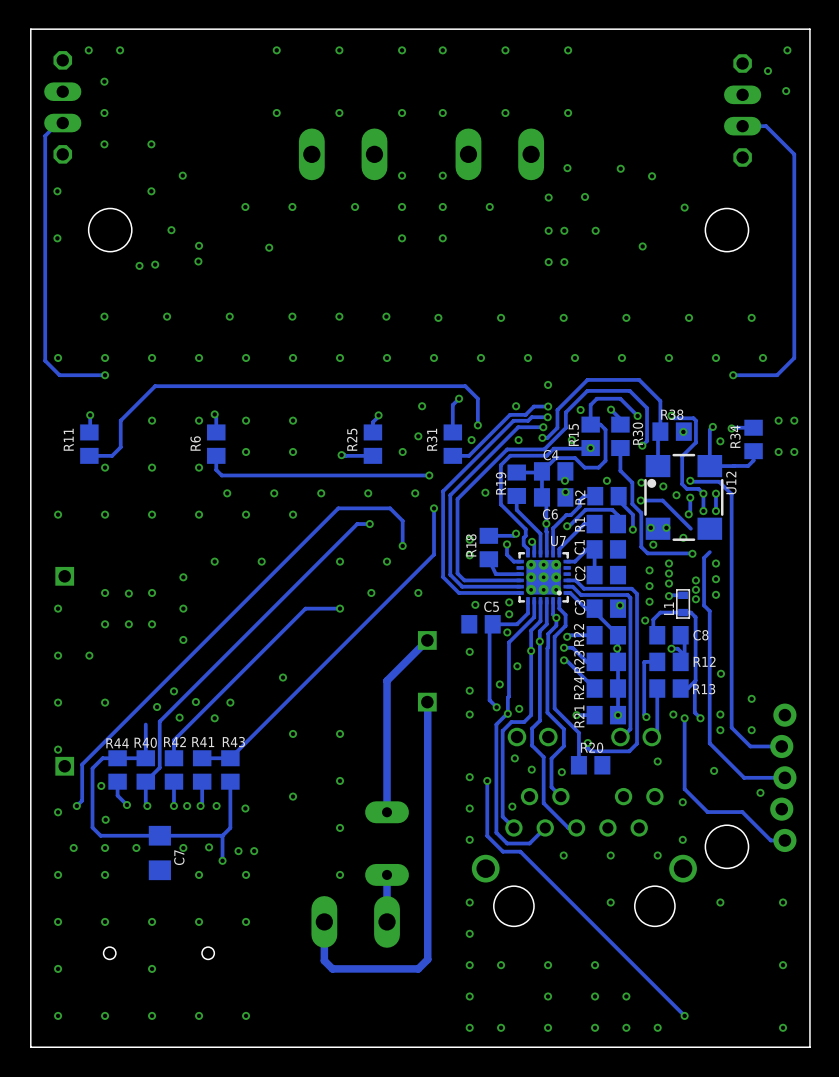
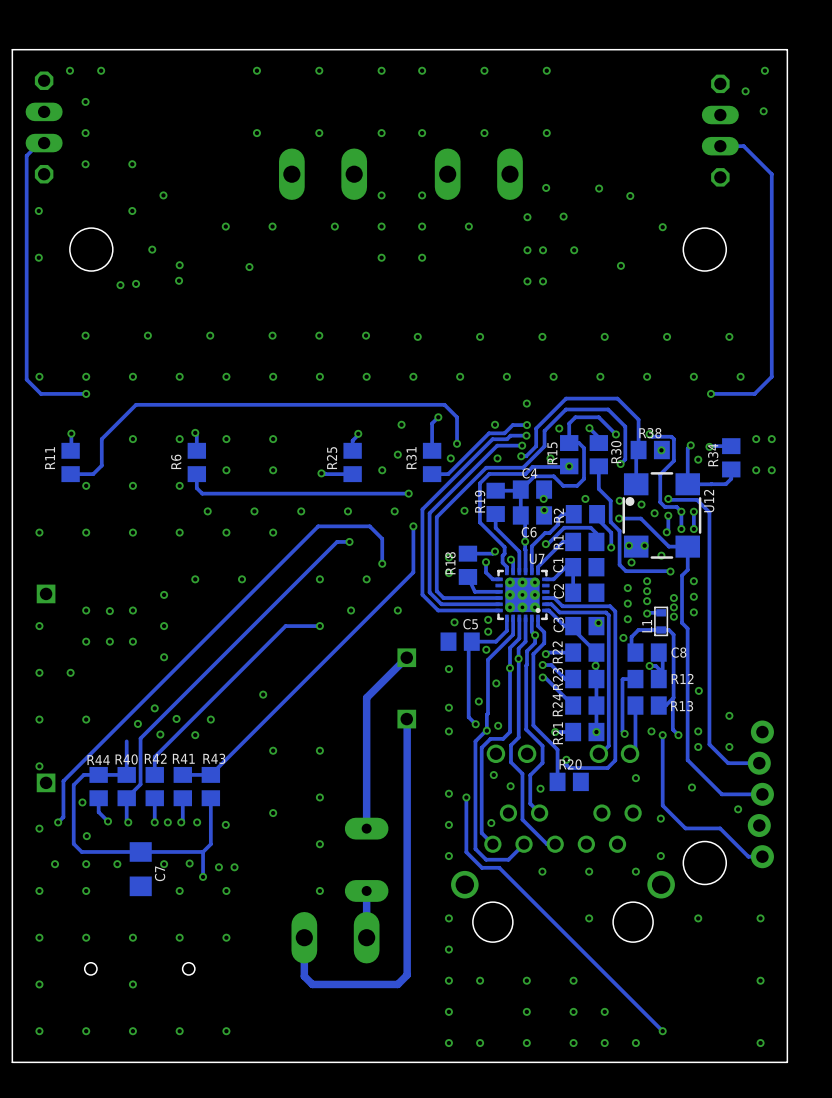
track: none -> (668, 546) (687, 546) (687, 569)

